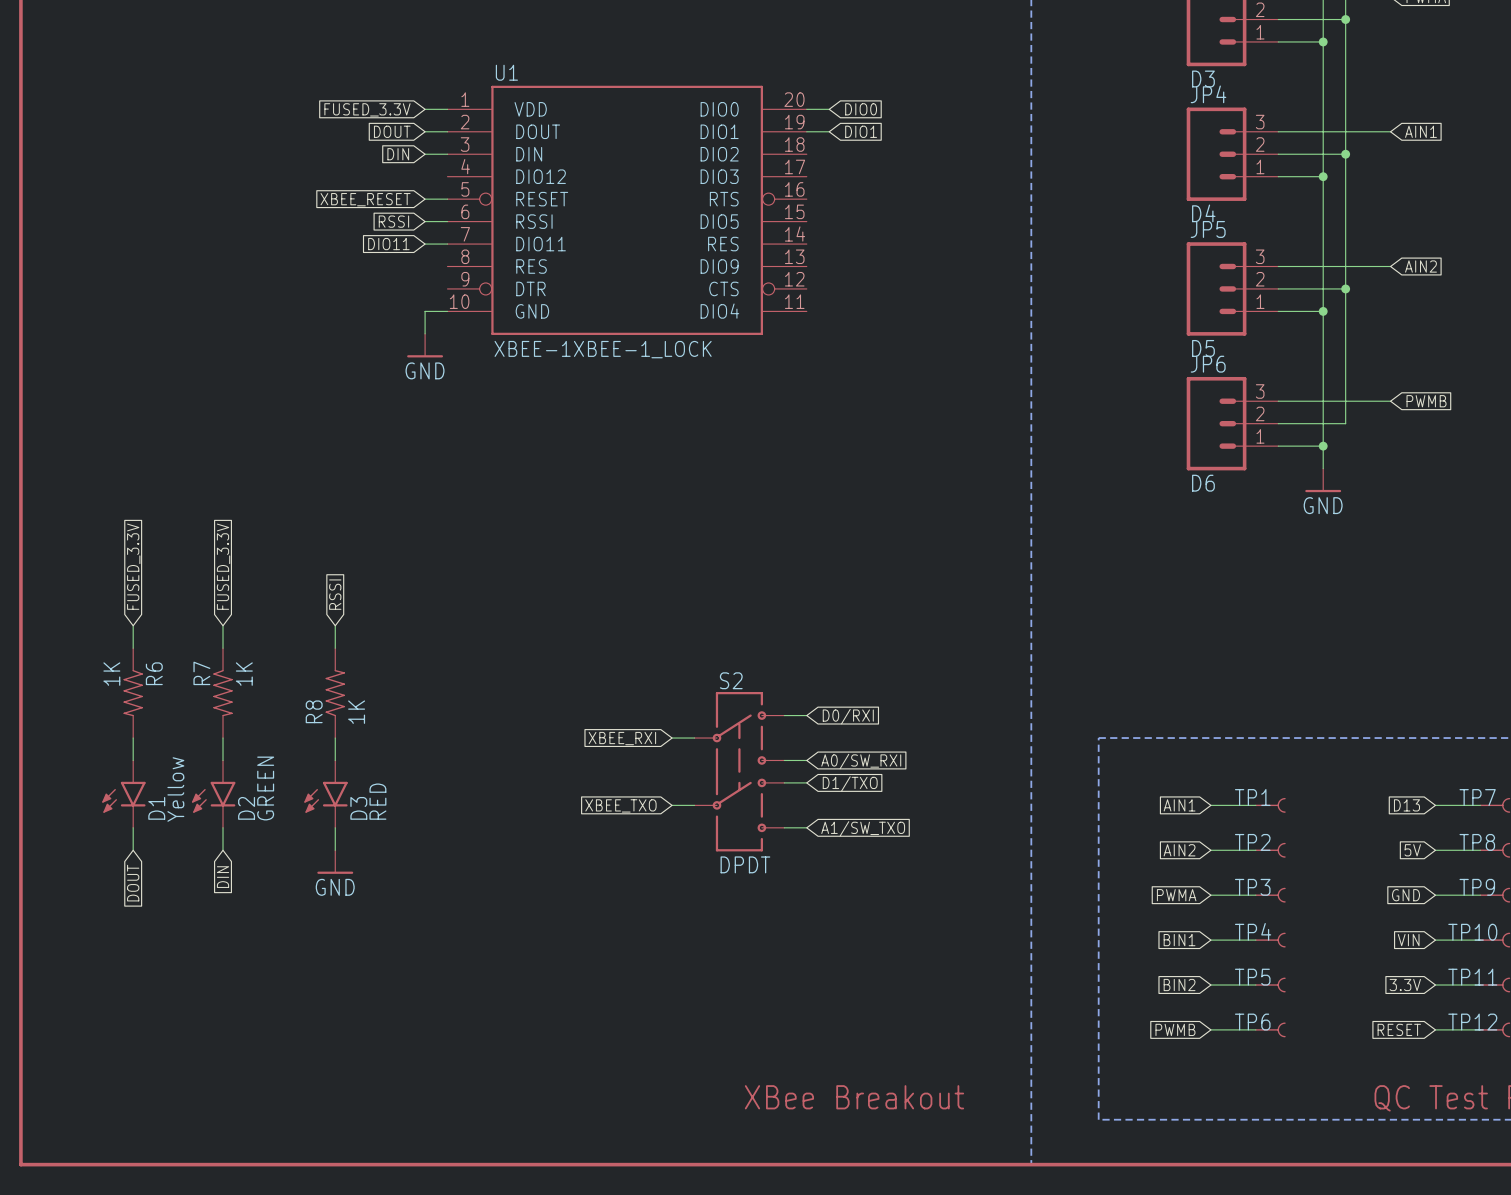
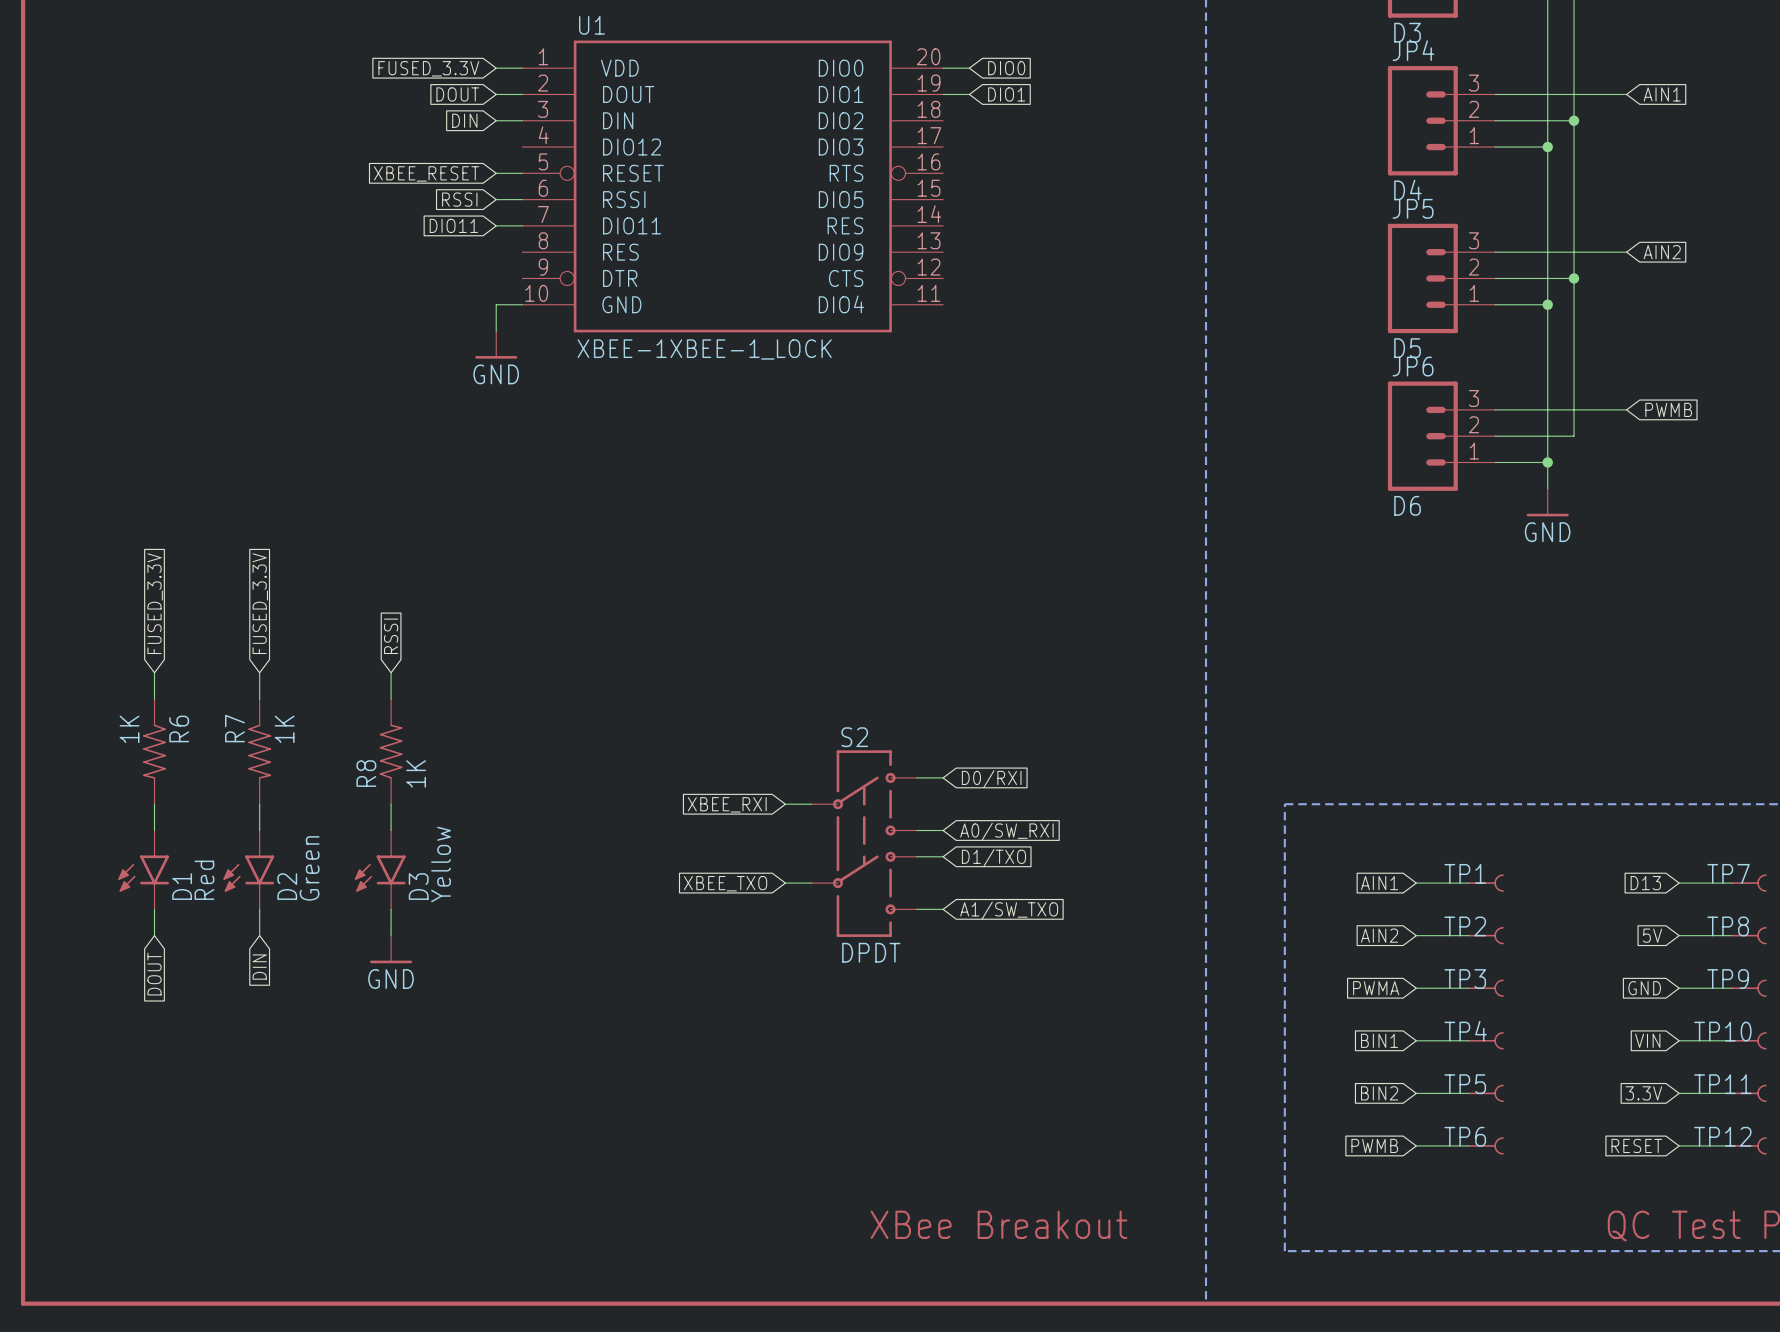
D2 value: GREEN (265, 788) -> Green (309, 868)
D1 value: Yellow (175, 789) -> Red (204, 880)
D3 value: RED (377, 801) -> Yellow (441, 864)

